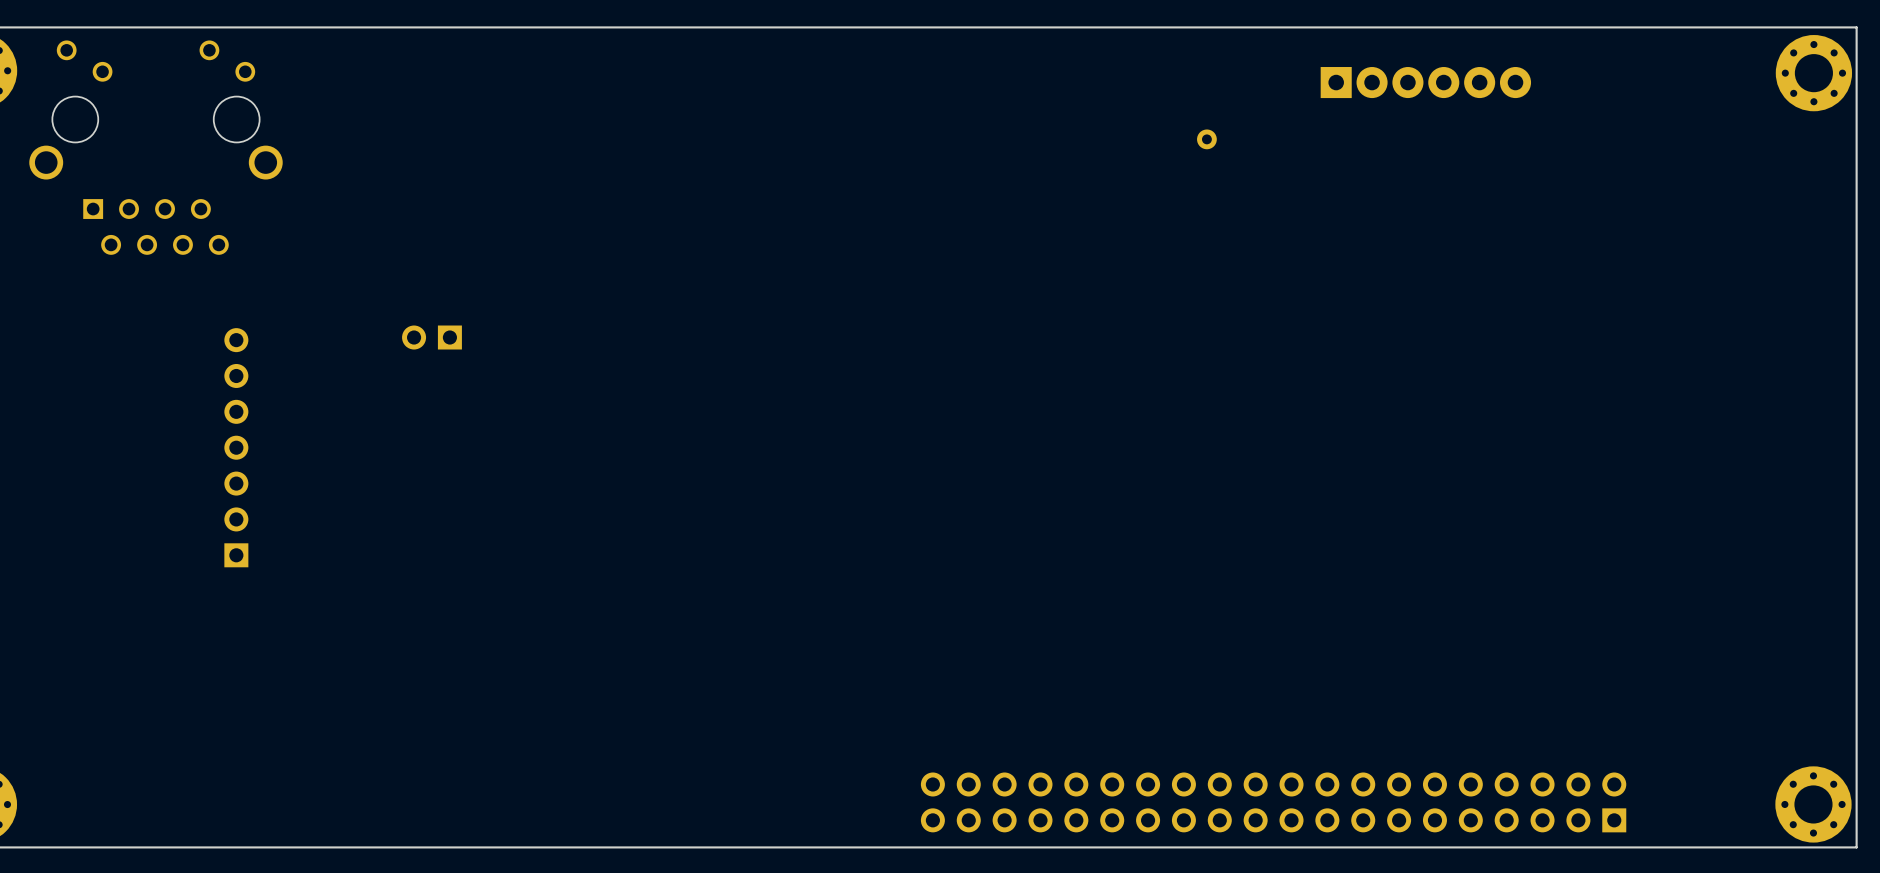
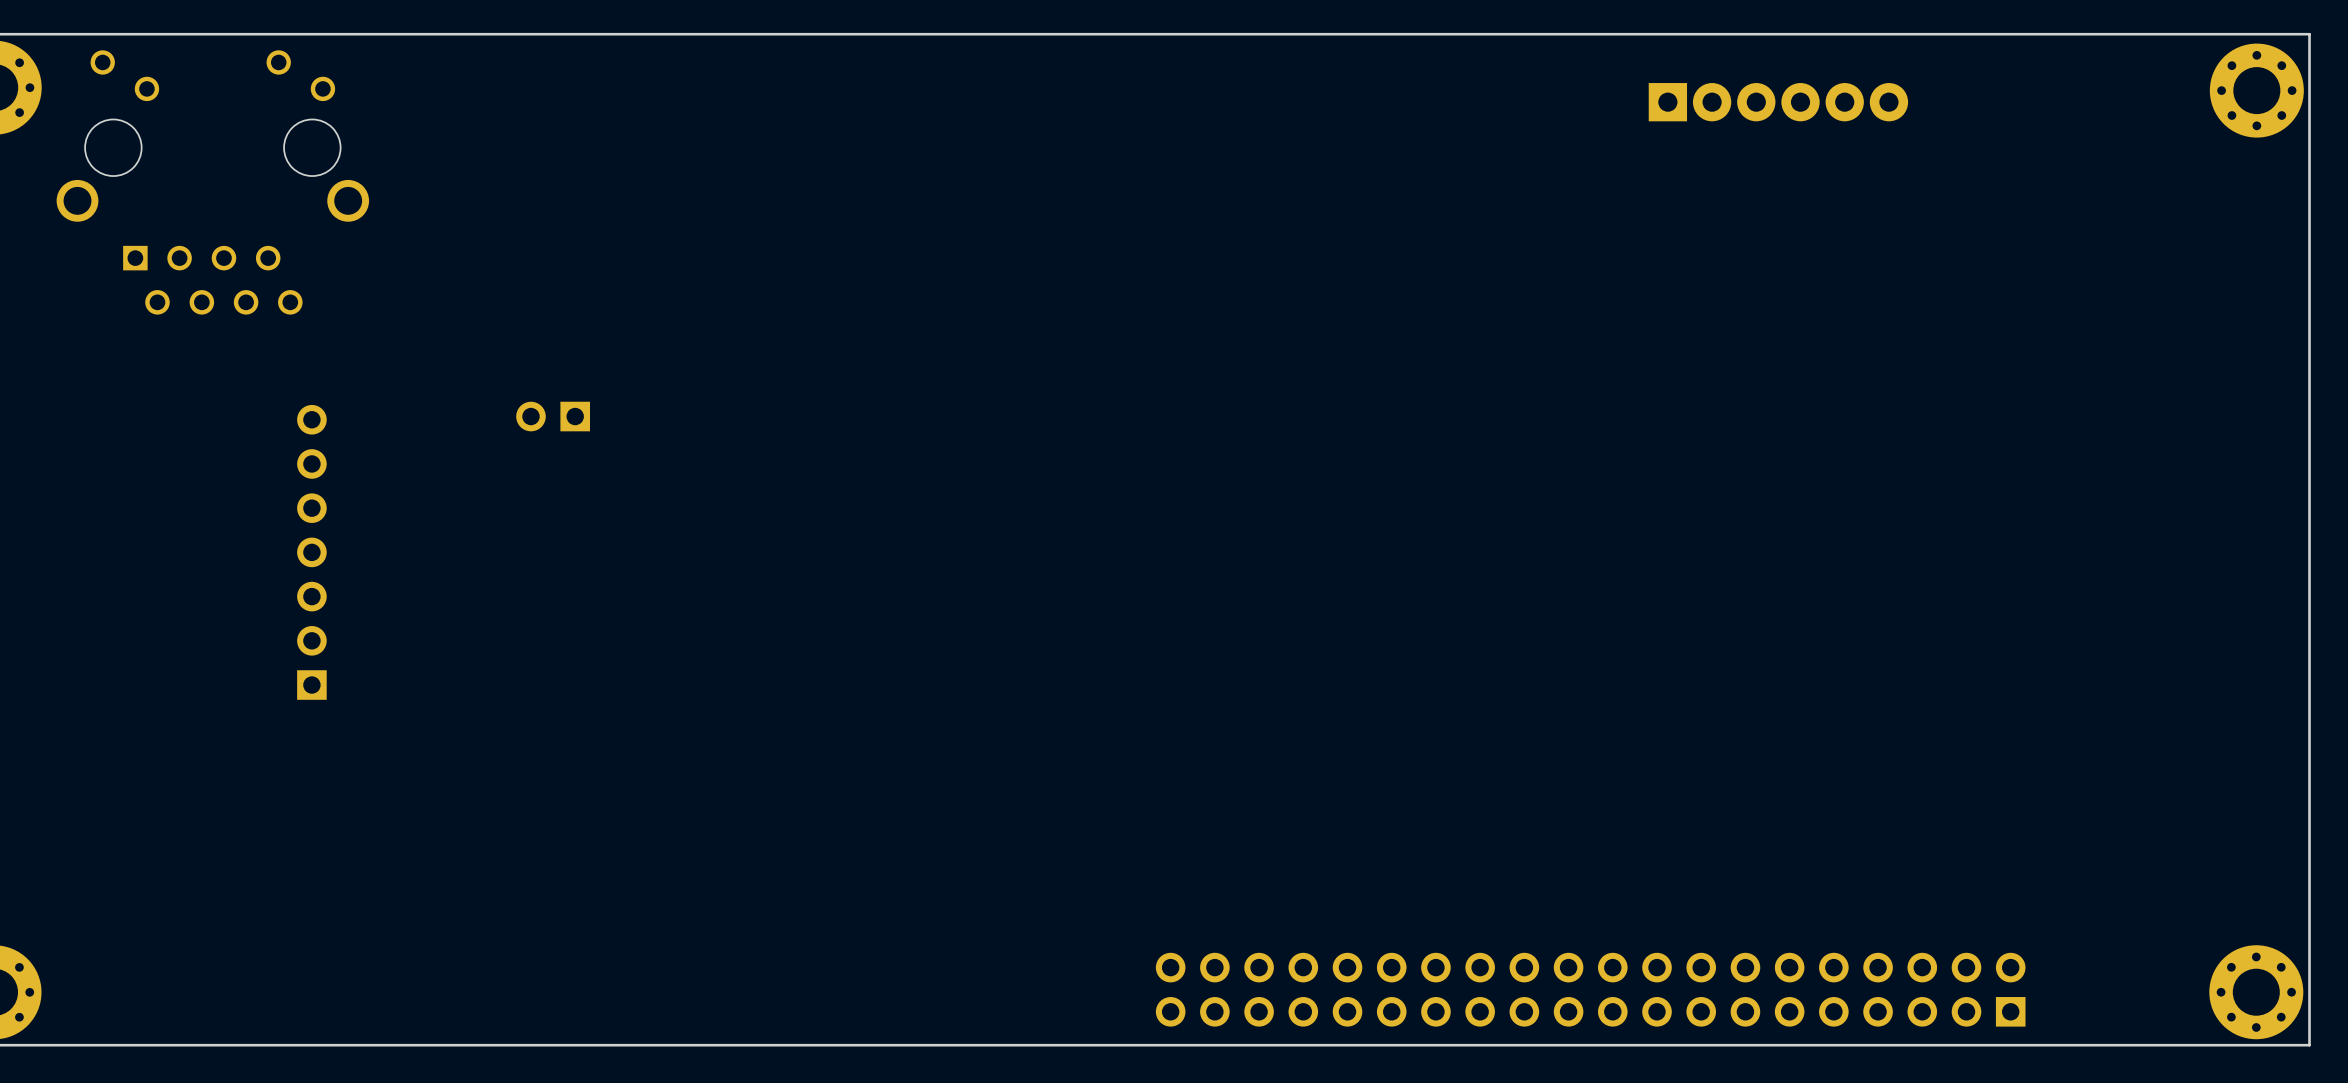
part: (1206, 139) -> none

